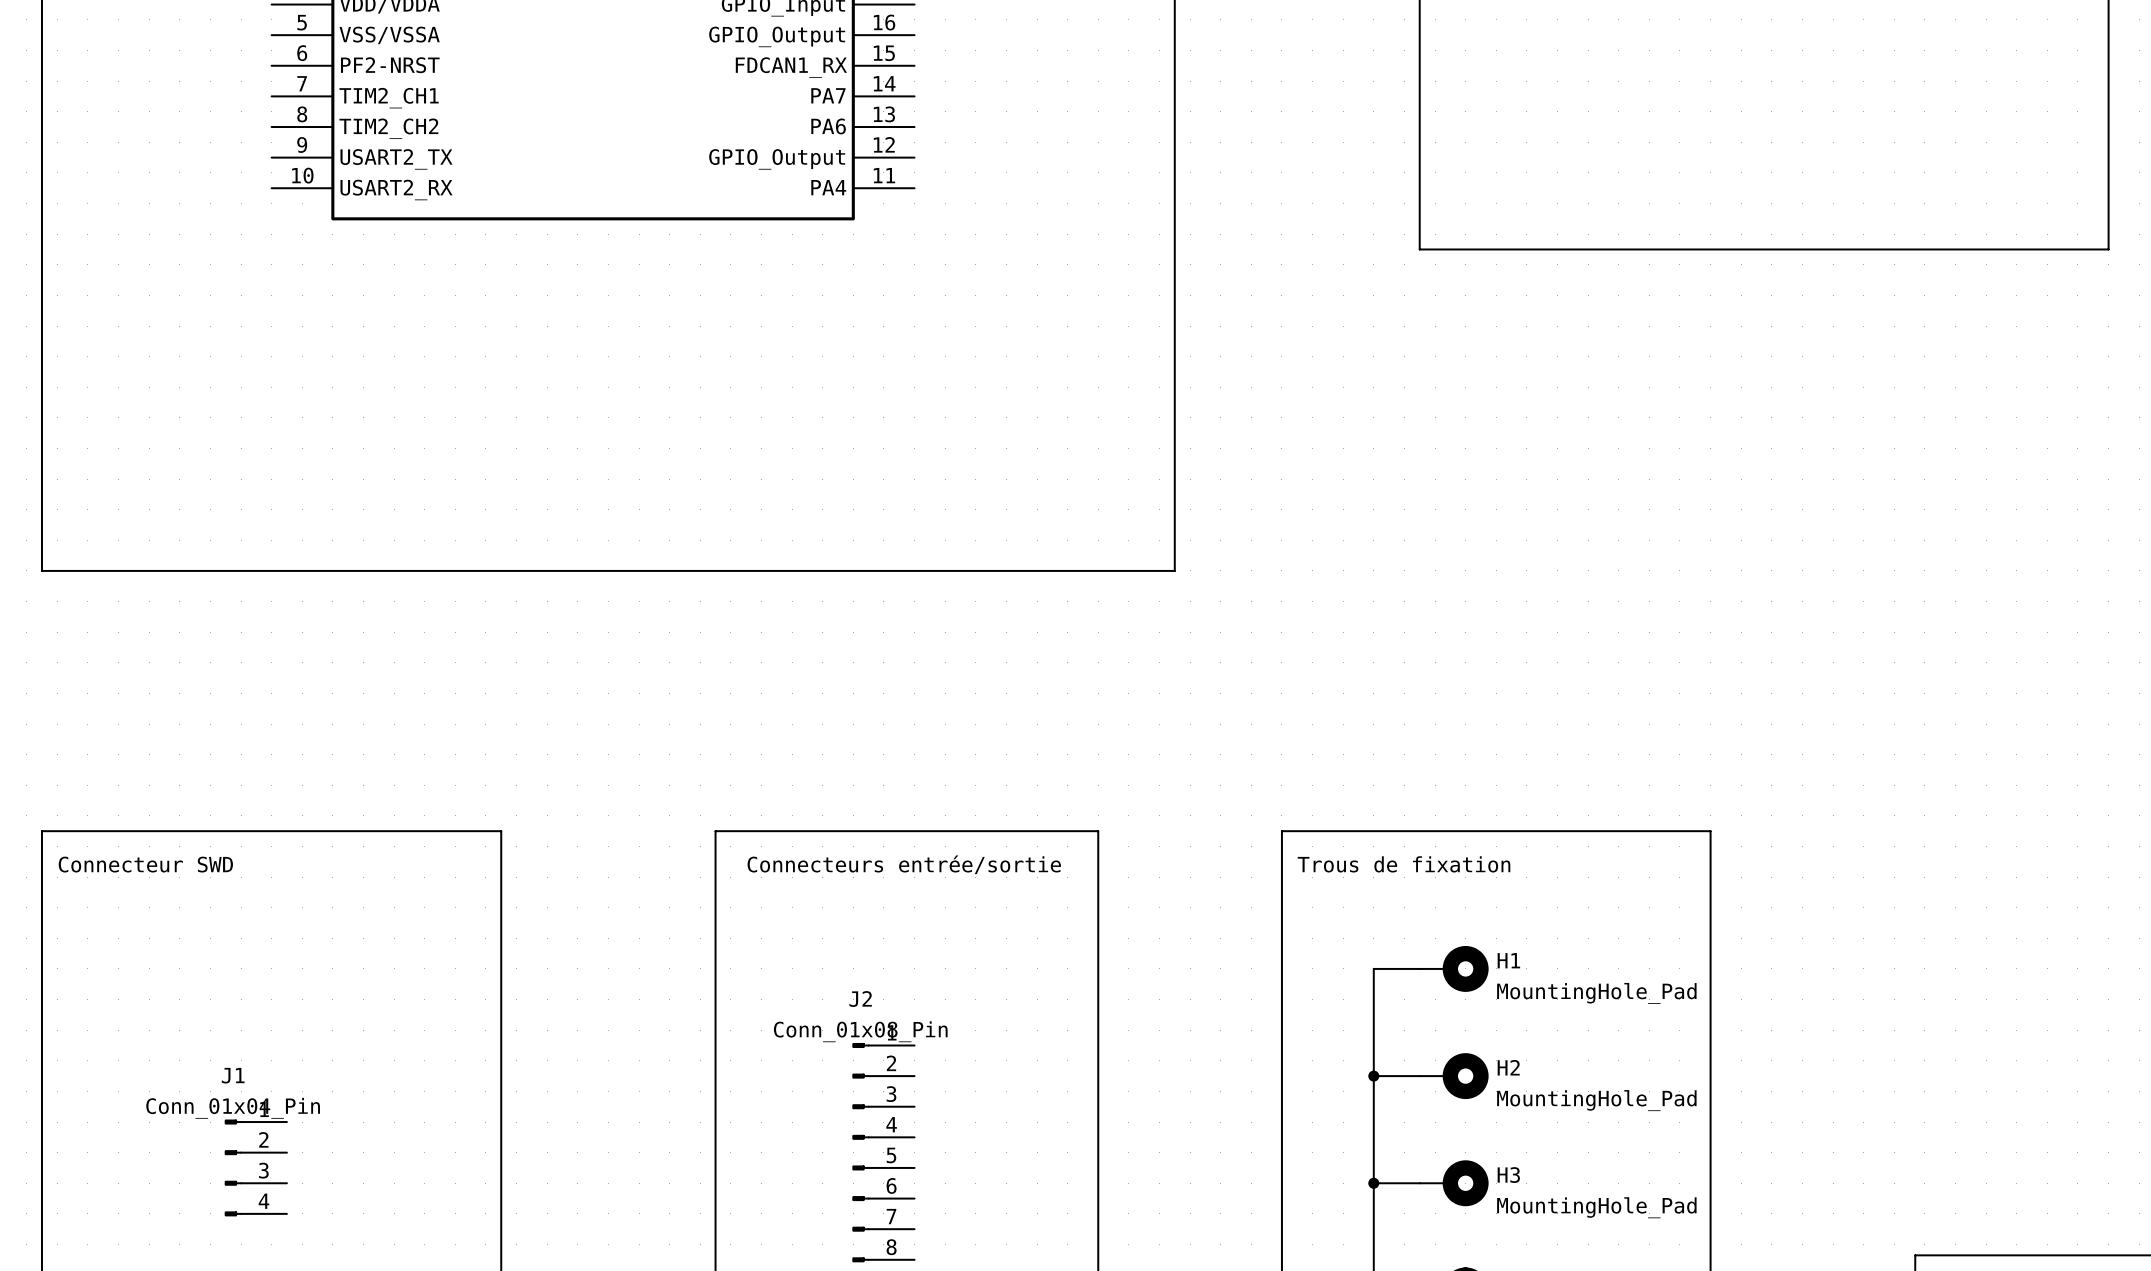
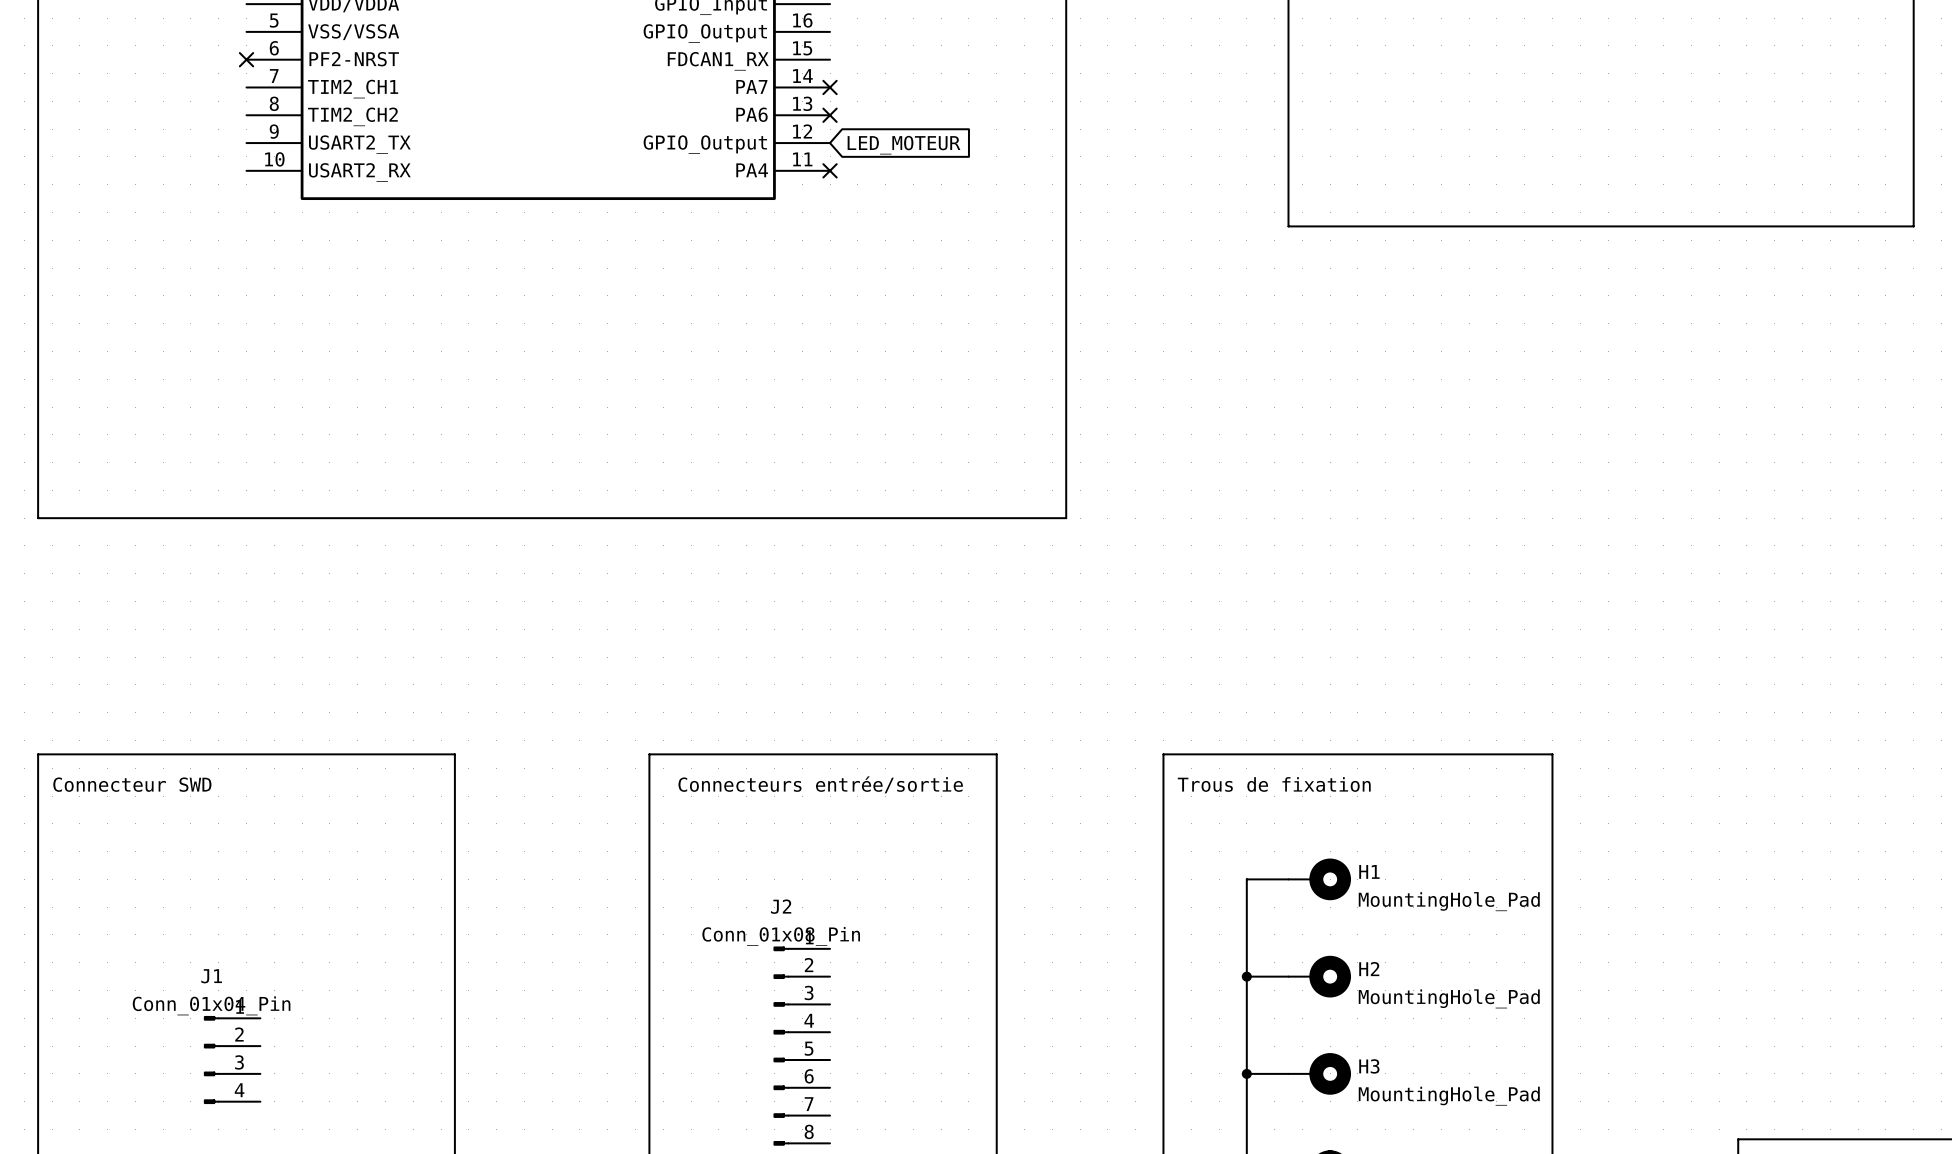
no-connect mark: none -> (246, 59)
no-connect mark: none -> (830, 87)
no-connect mark: none -> (830, 115)
global label: none -> LED_MOTEUR (904, 145)
no-connect mark: none -> (830, 170)

